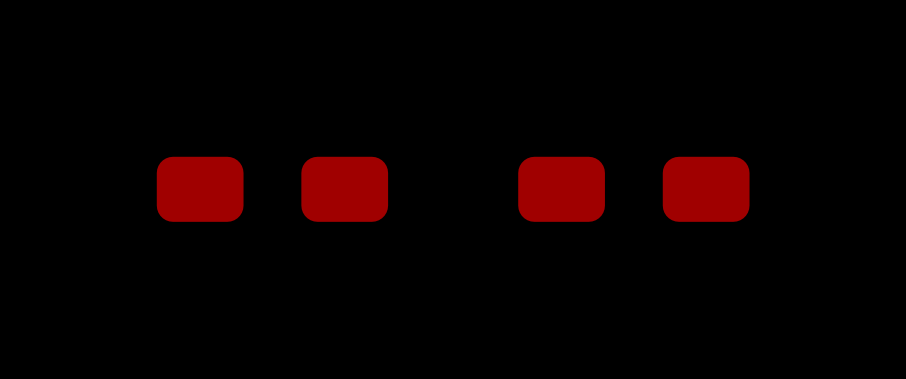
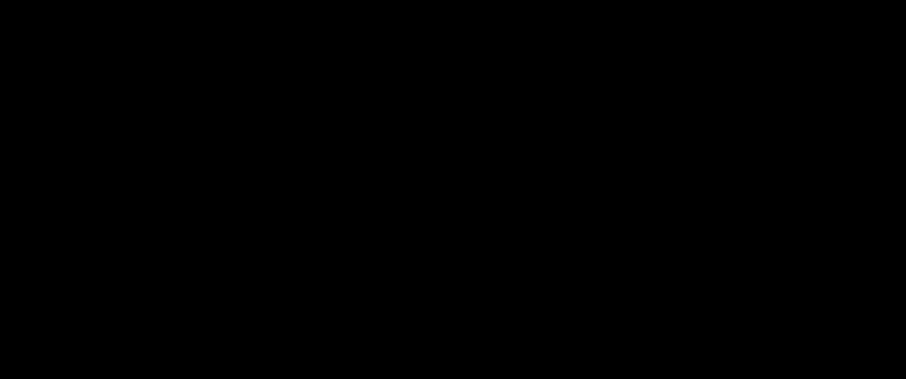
part: (272, 189) -> none
part: (633, 189) -> none

